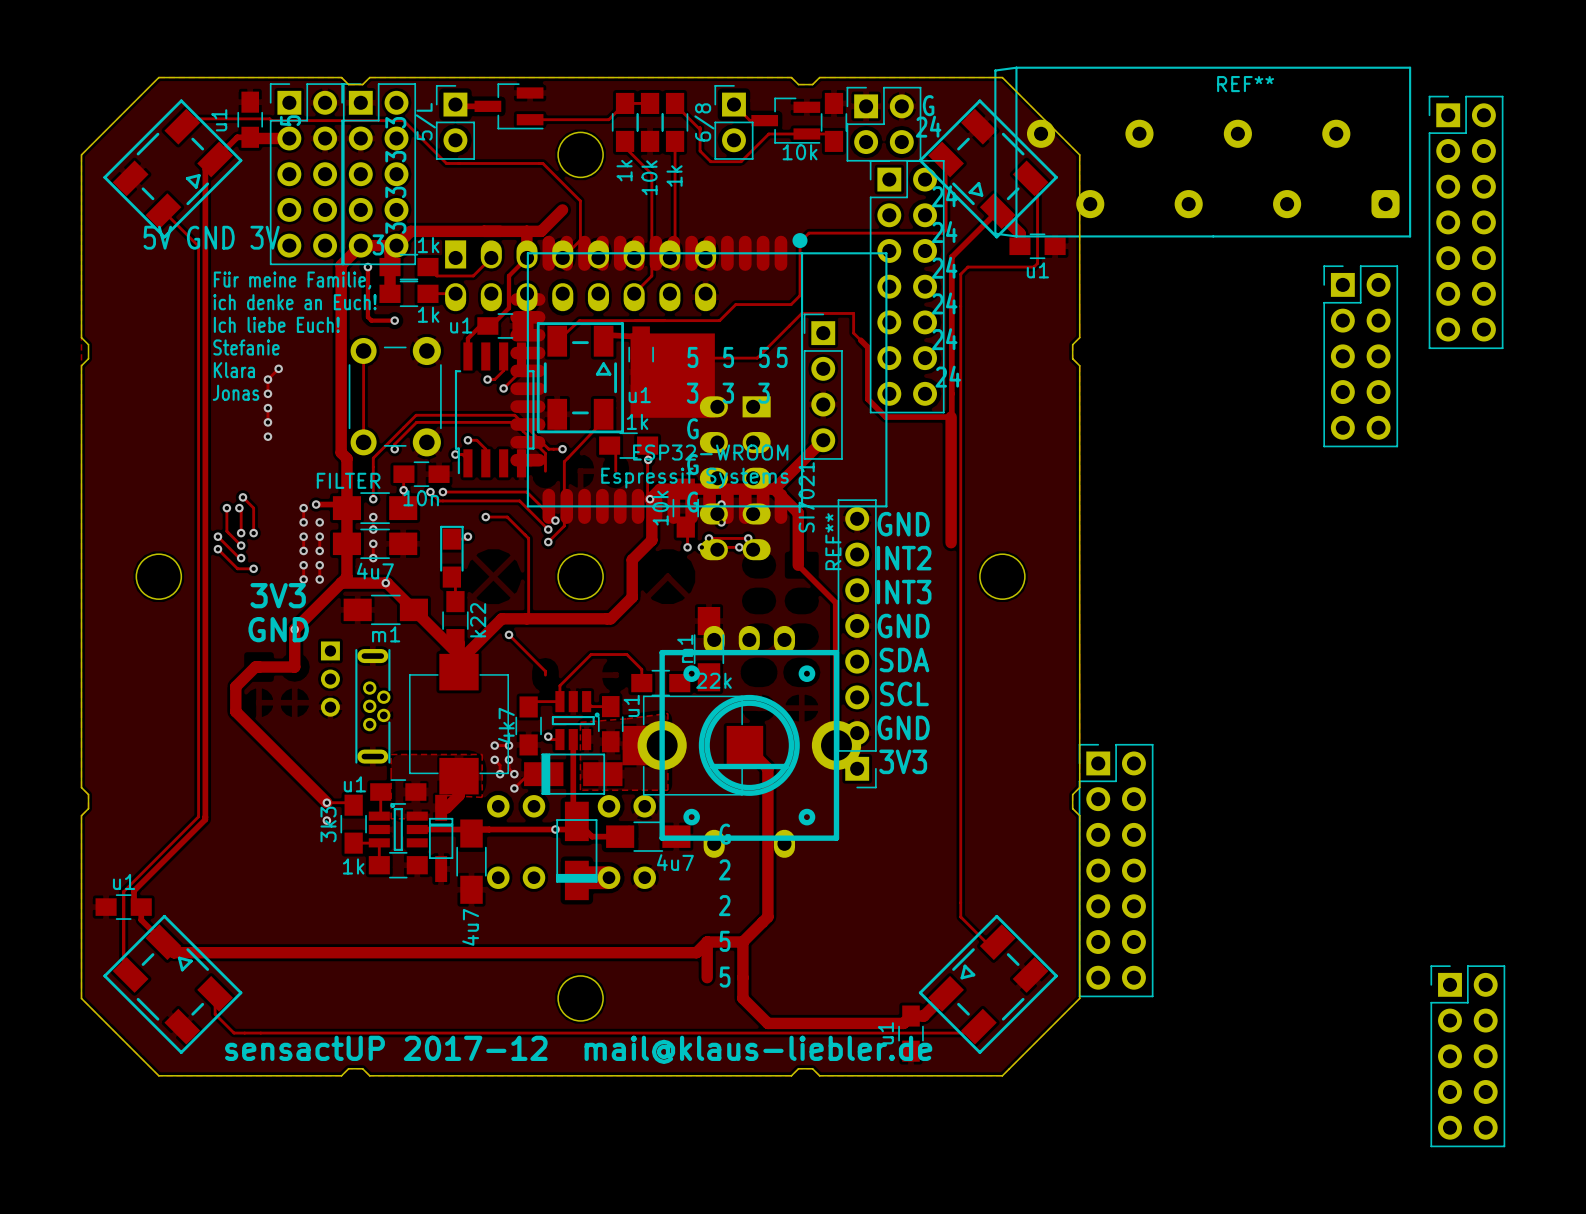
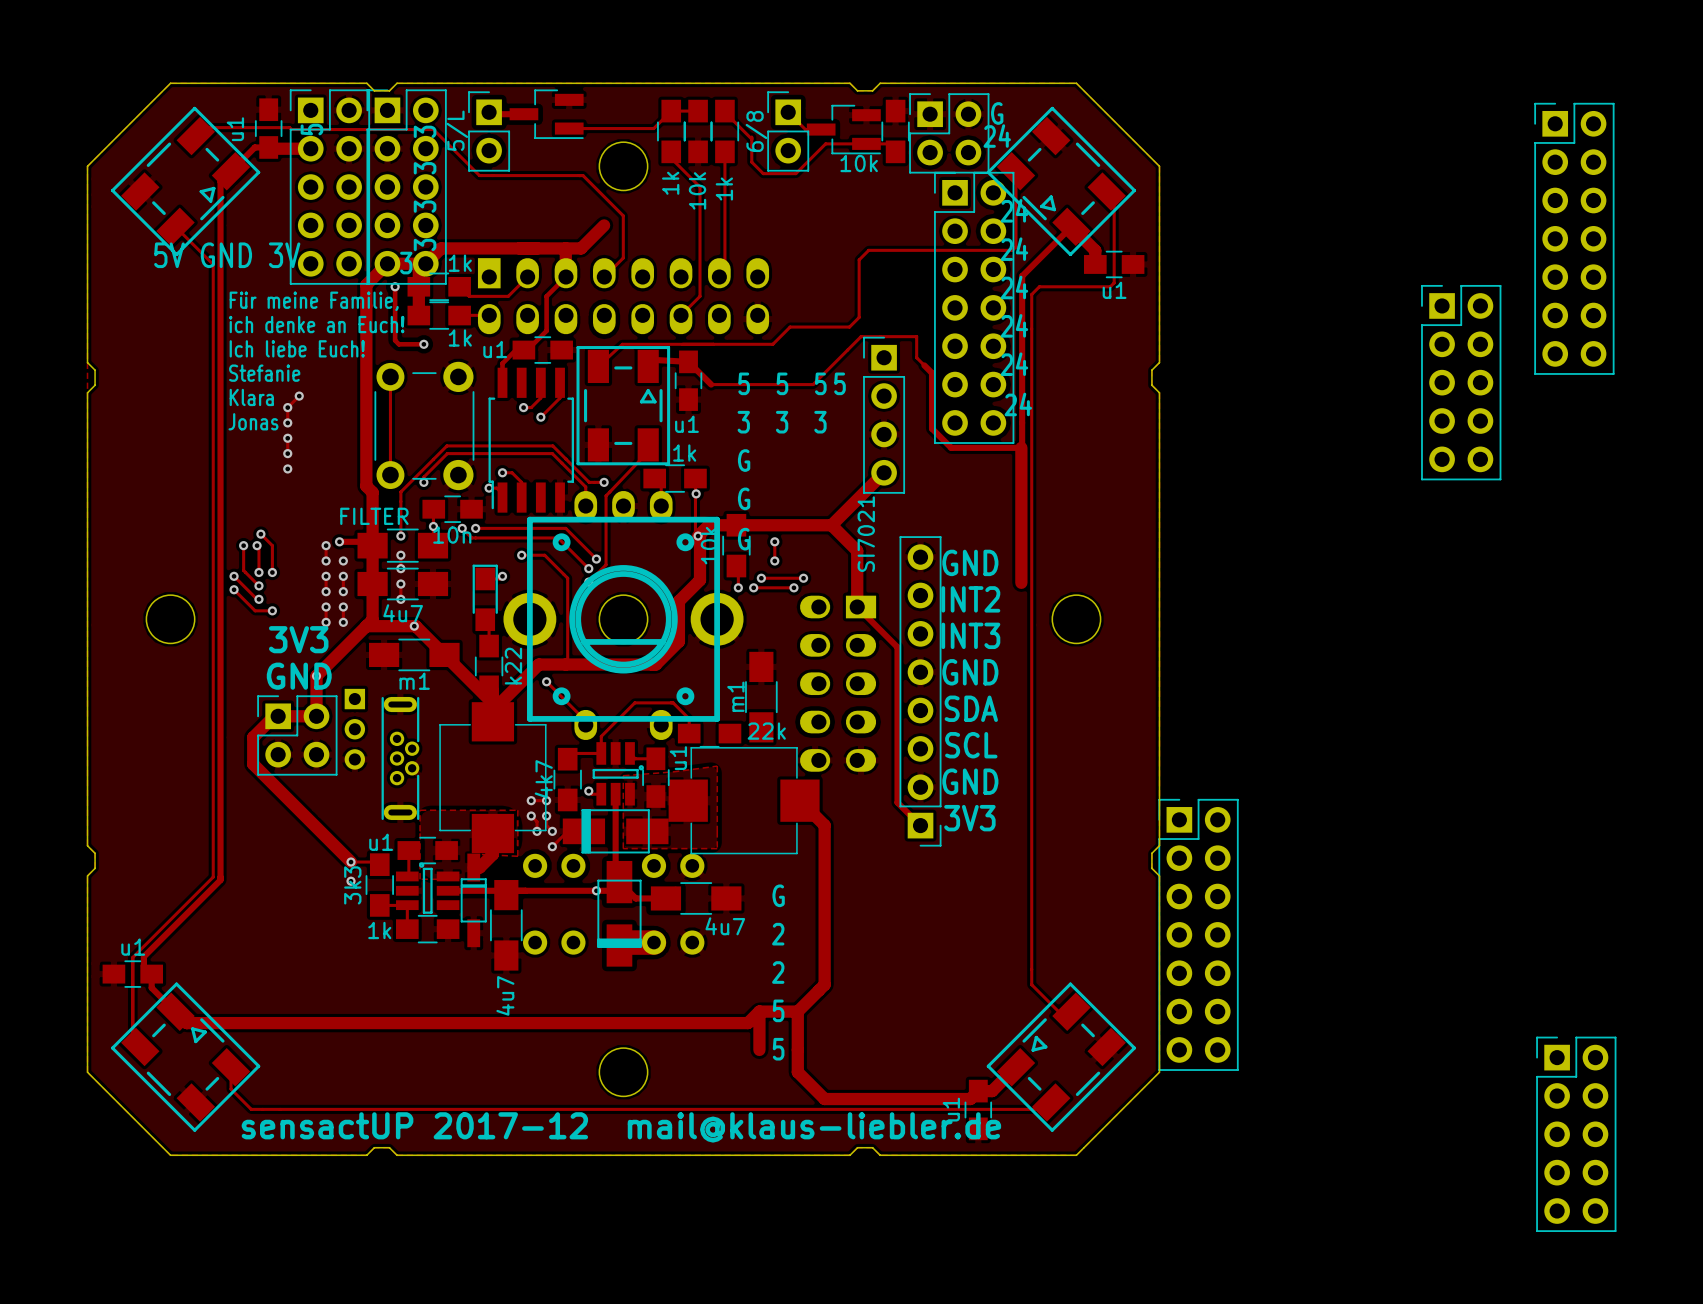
REF**: (1202, 152) -> none
REF**: (698, 378) -> none
part position: (735, 478) -> (838, 683)
part: none -> (297, 735)
part position: (749, 741) -> (623, 615)

